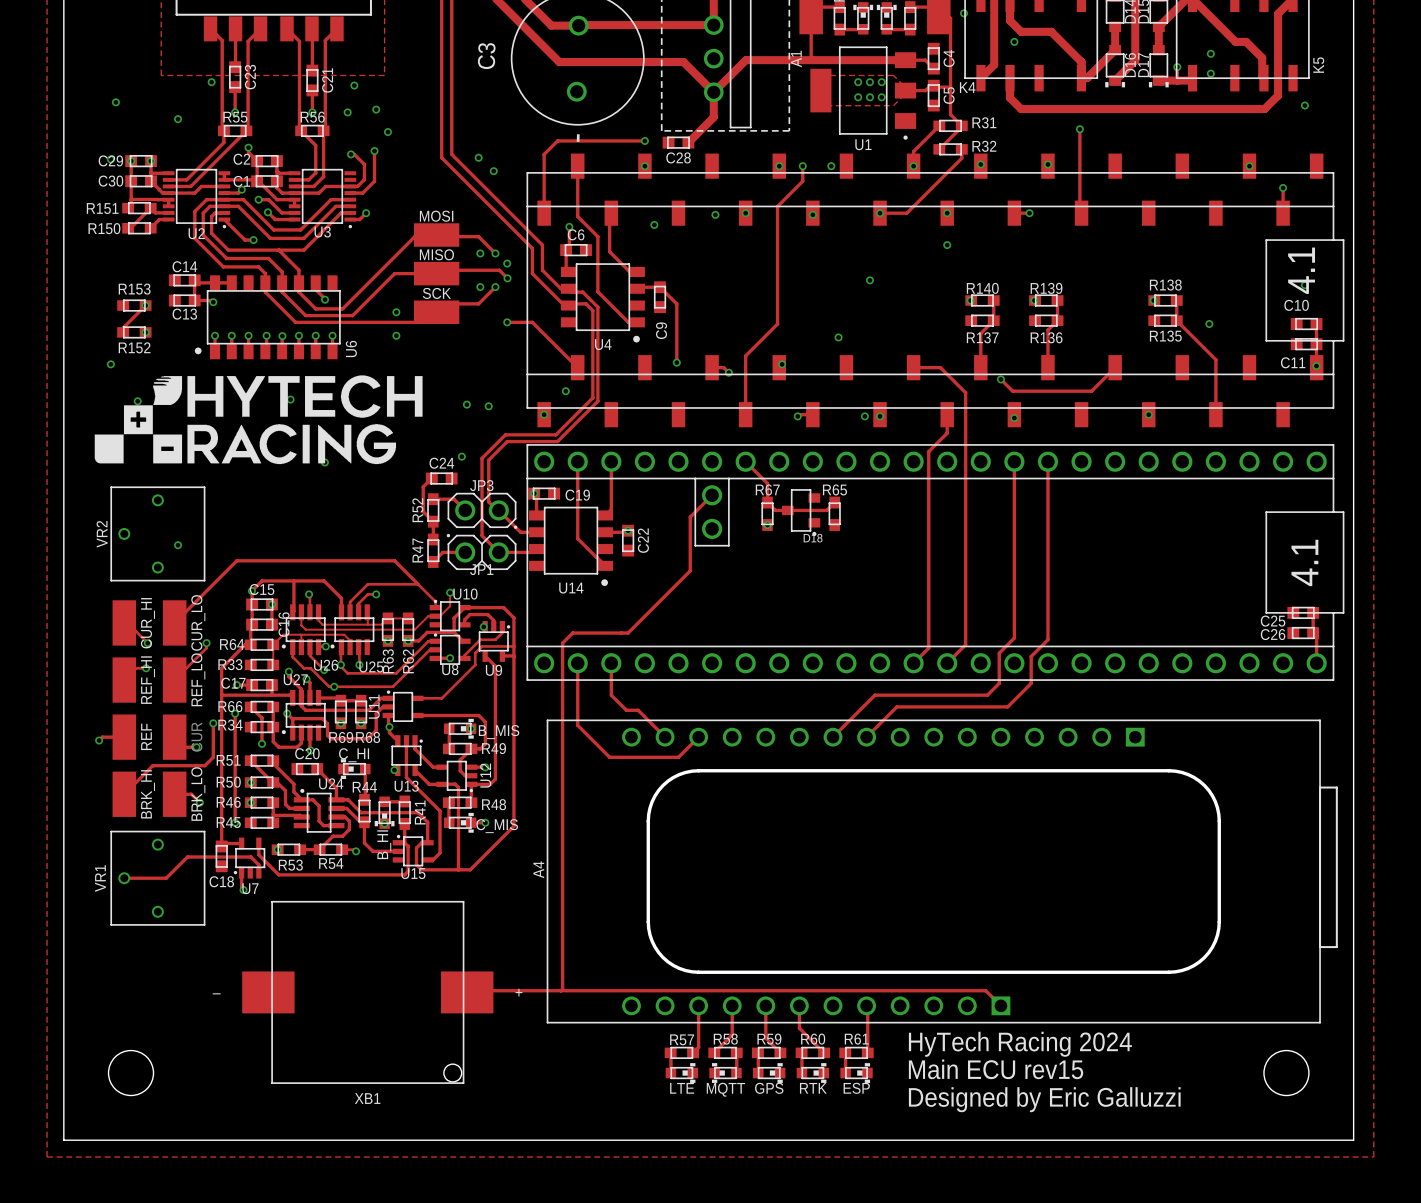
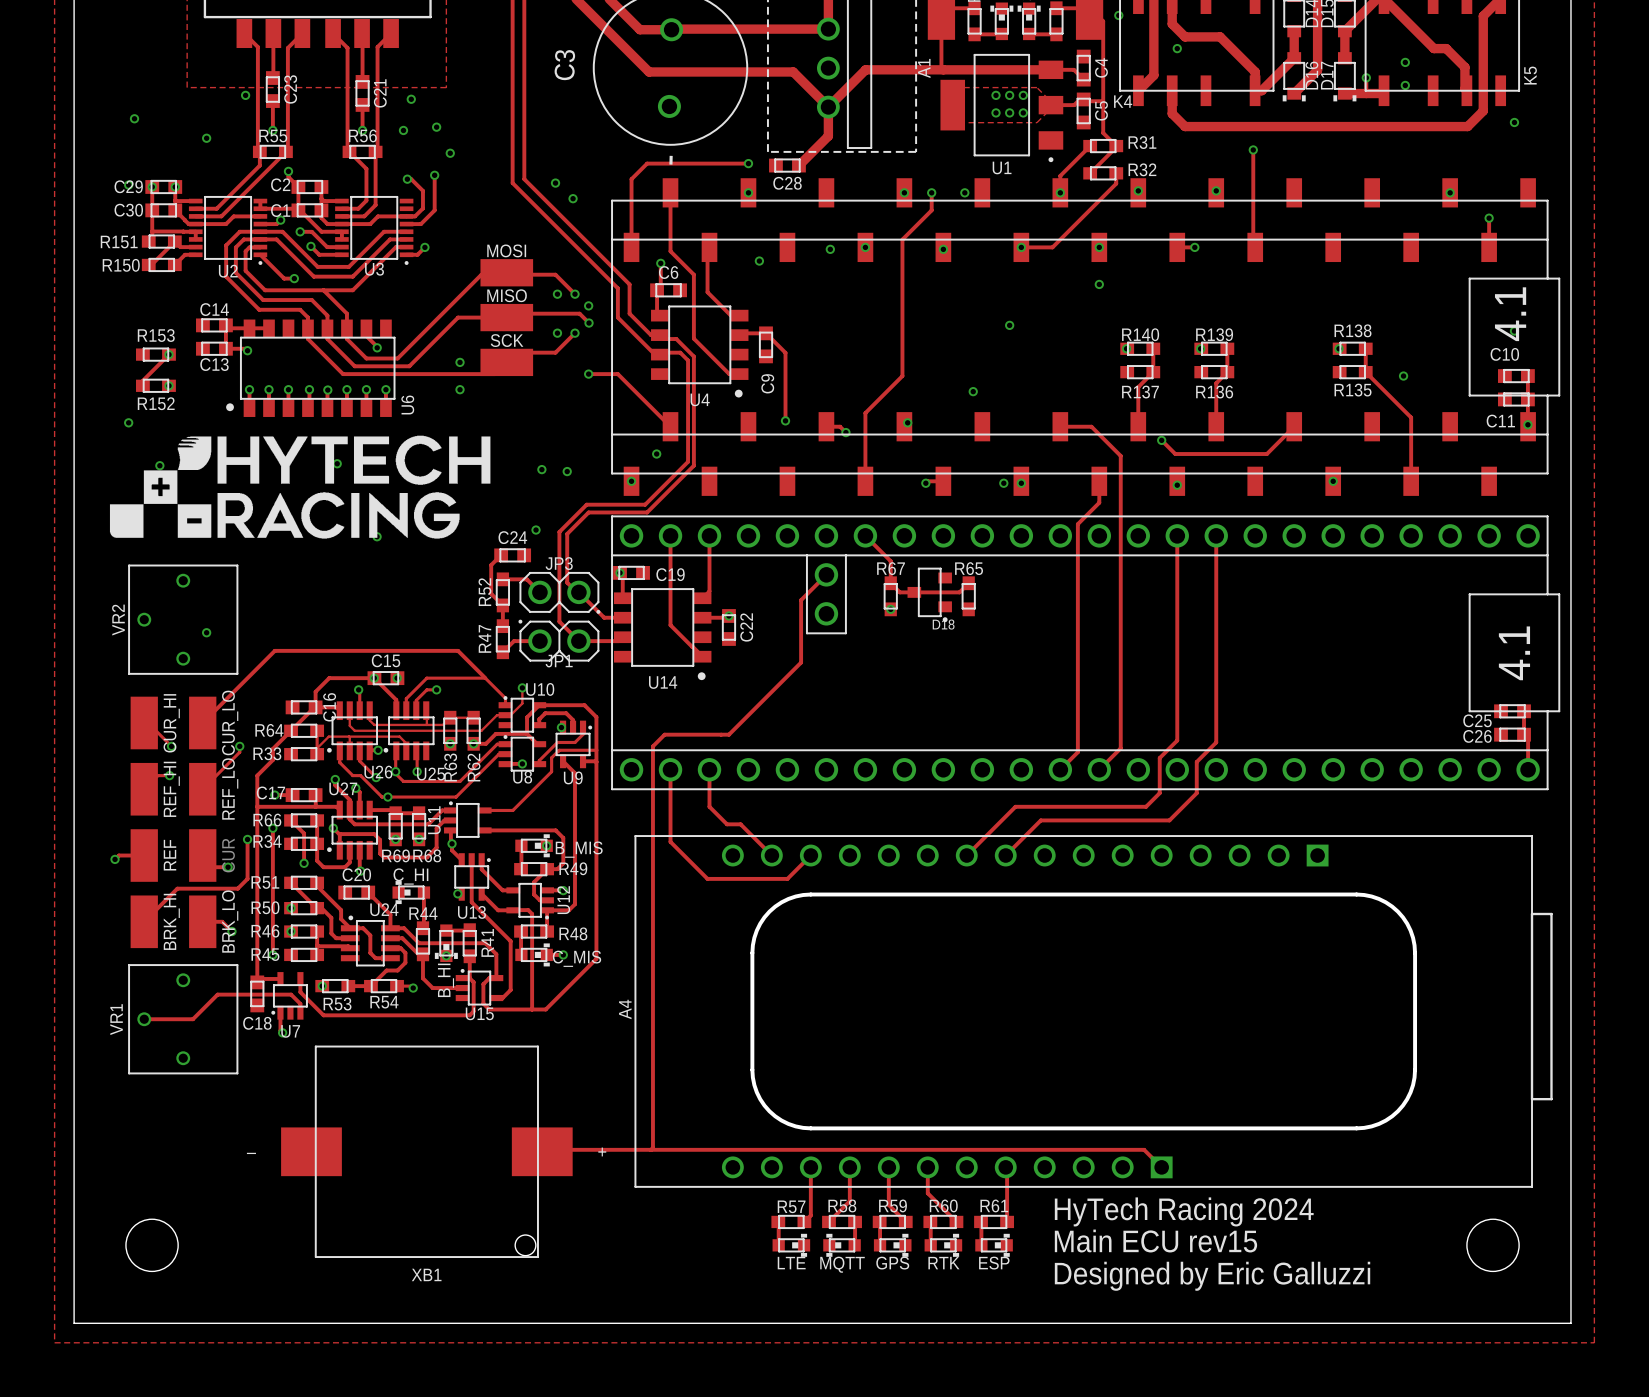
track: (293, 580) (292, 612) -> none
via: none -> (374, 678)
via: none -> (397, 678)
track: (251, 591) (262, 580) (324, 580) (341, 598) (341, 603) -> (315, 701) (315, 691) (329, 678) (374, 678) (396, 700)
via: (251, 591) -> none
track: (252, 591) (250, 644) (245, 644) (235, 654) -> (339, 710) (336, 707) (314, 707) (272, 748) (272, 760)
C15 position: (262, 604) -> (385, 678)
via: (271, 604) -> none
track: (271, 609) (271, 624) -> none
C16 position: (262, 624) -> (304, 707)
R64 position: (262, 644) -> (304, 730)
track: (273, 649) (273, 664) -> (317, 730) (317, 748)
R33 position: (262, 664) -> (304, 754)

